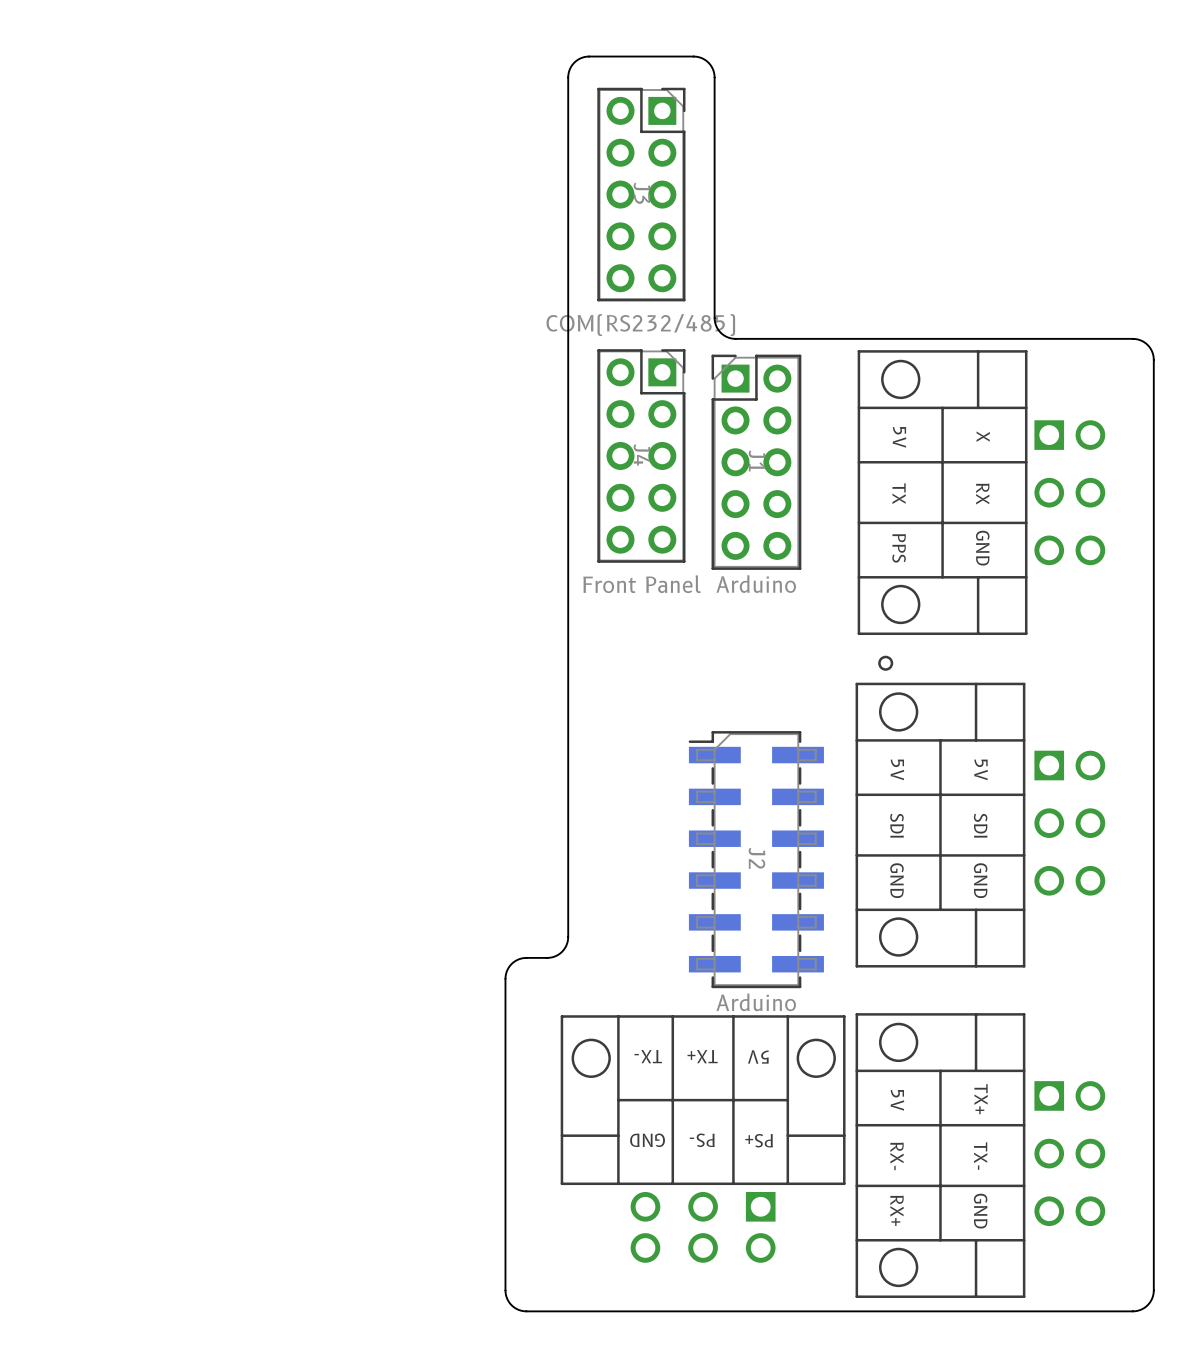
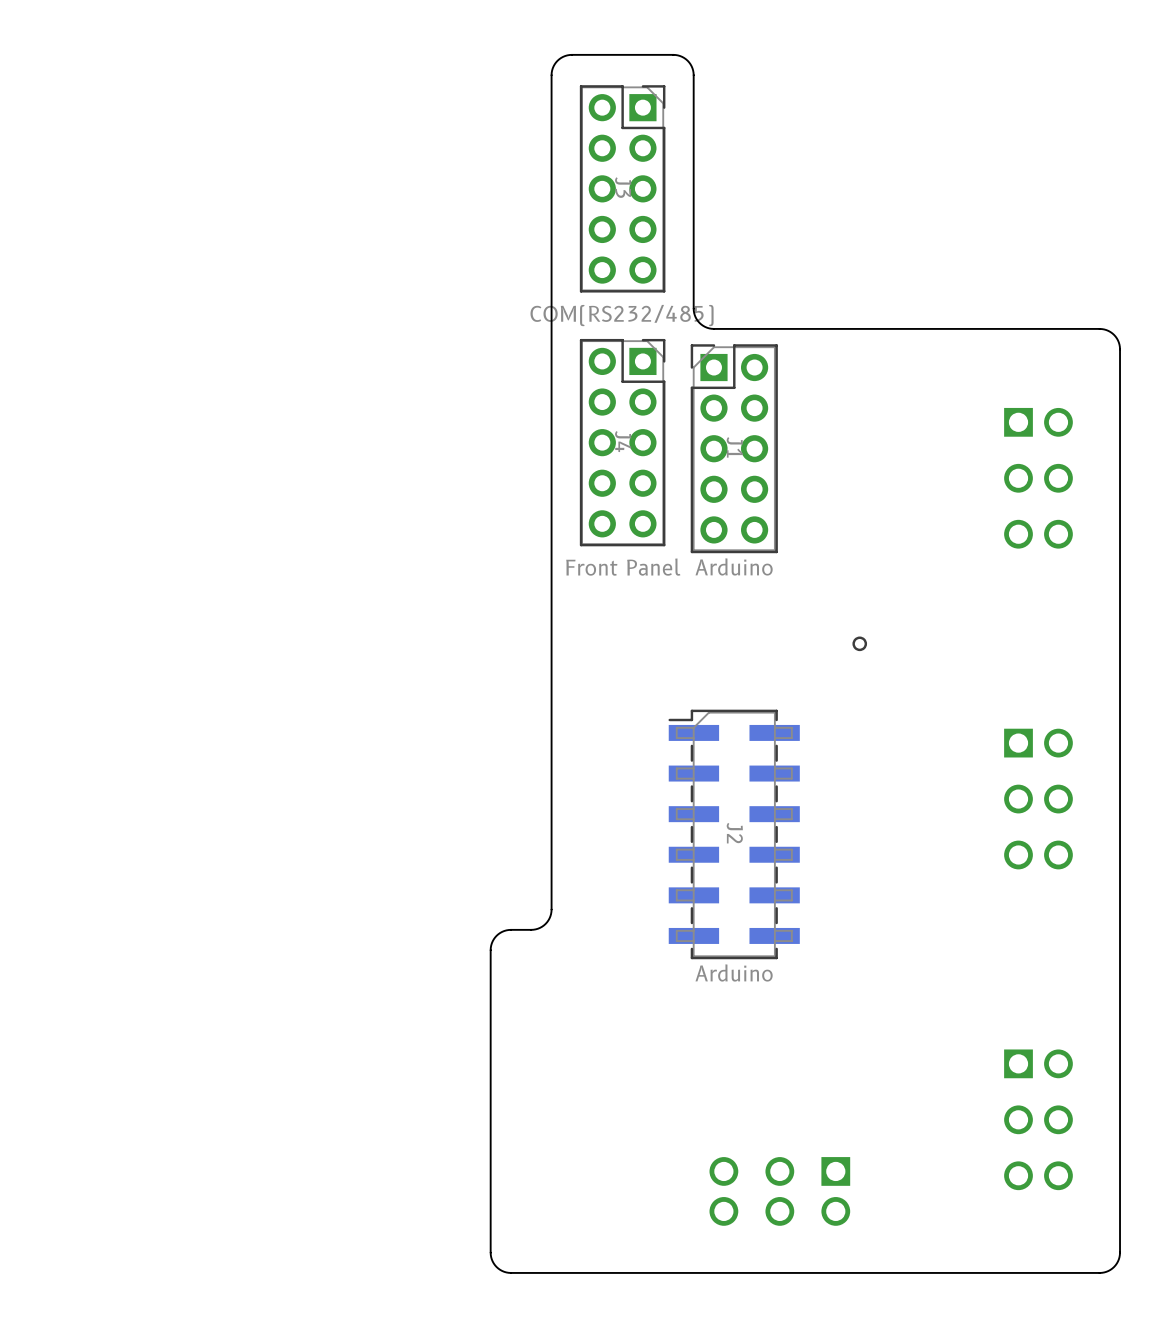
drawing: [857, 350, 1028, 636] -> none
drawing: [855, 682, 1026, 968] -> none
drawing: [560, 1013, 1026, 1298] -> none
part position: (703, 1227) -> (779, 1191)

